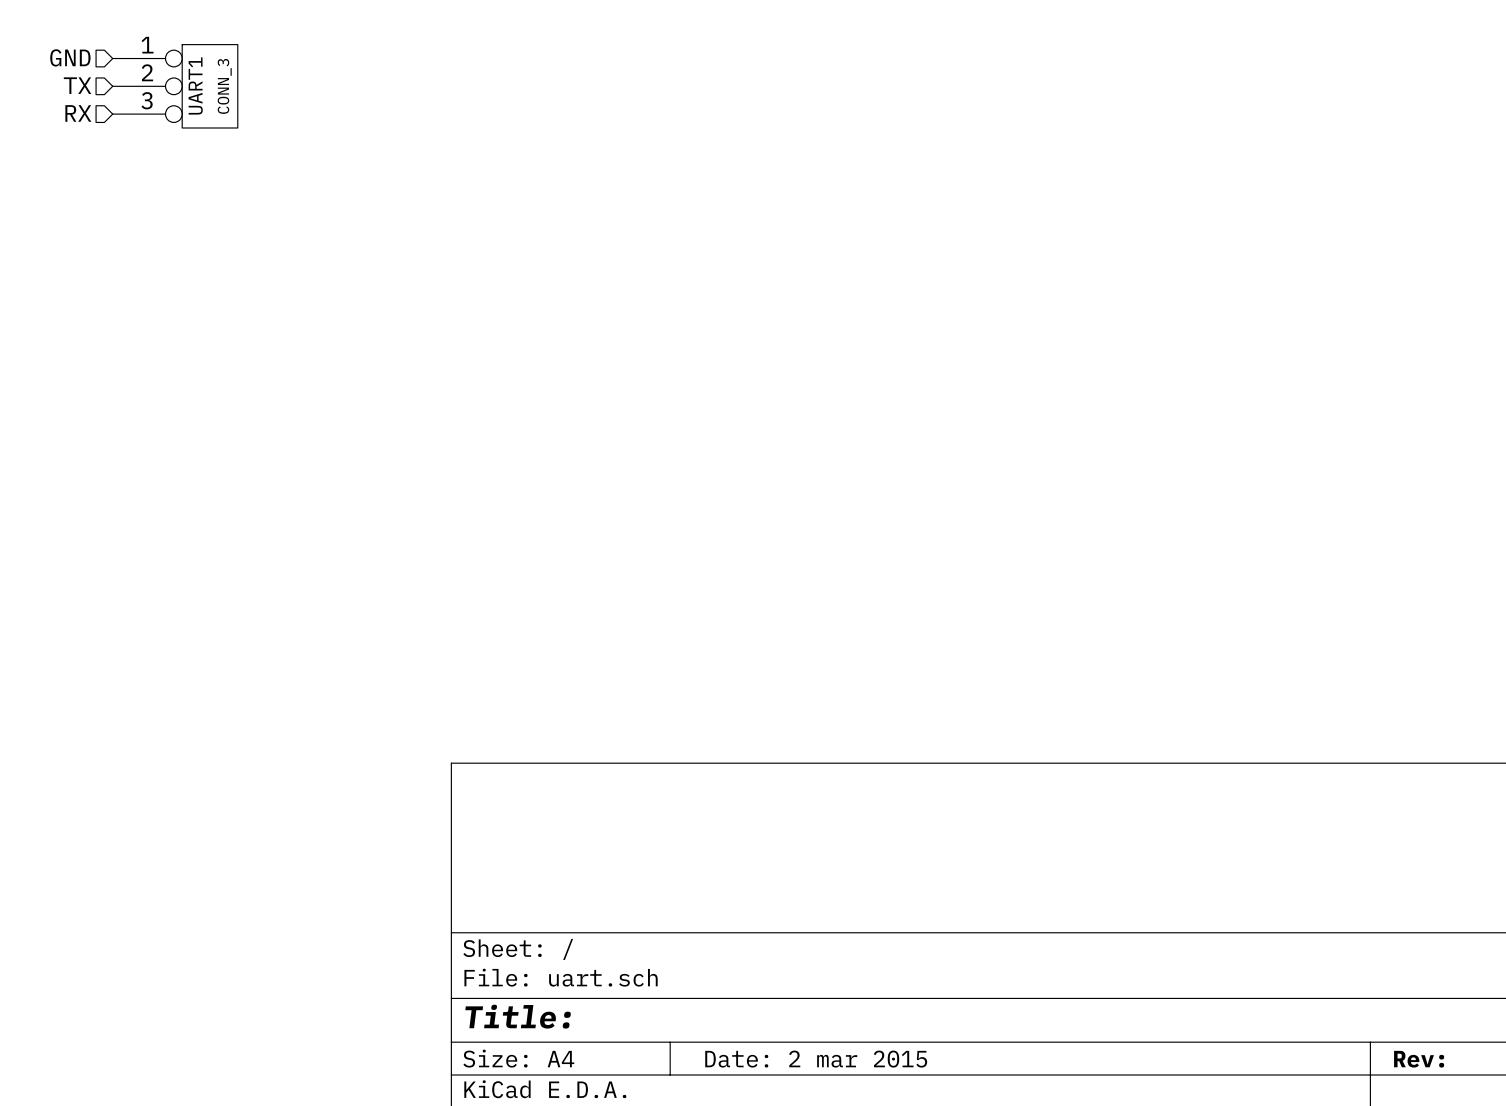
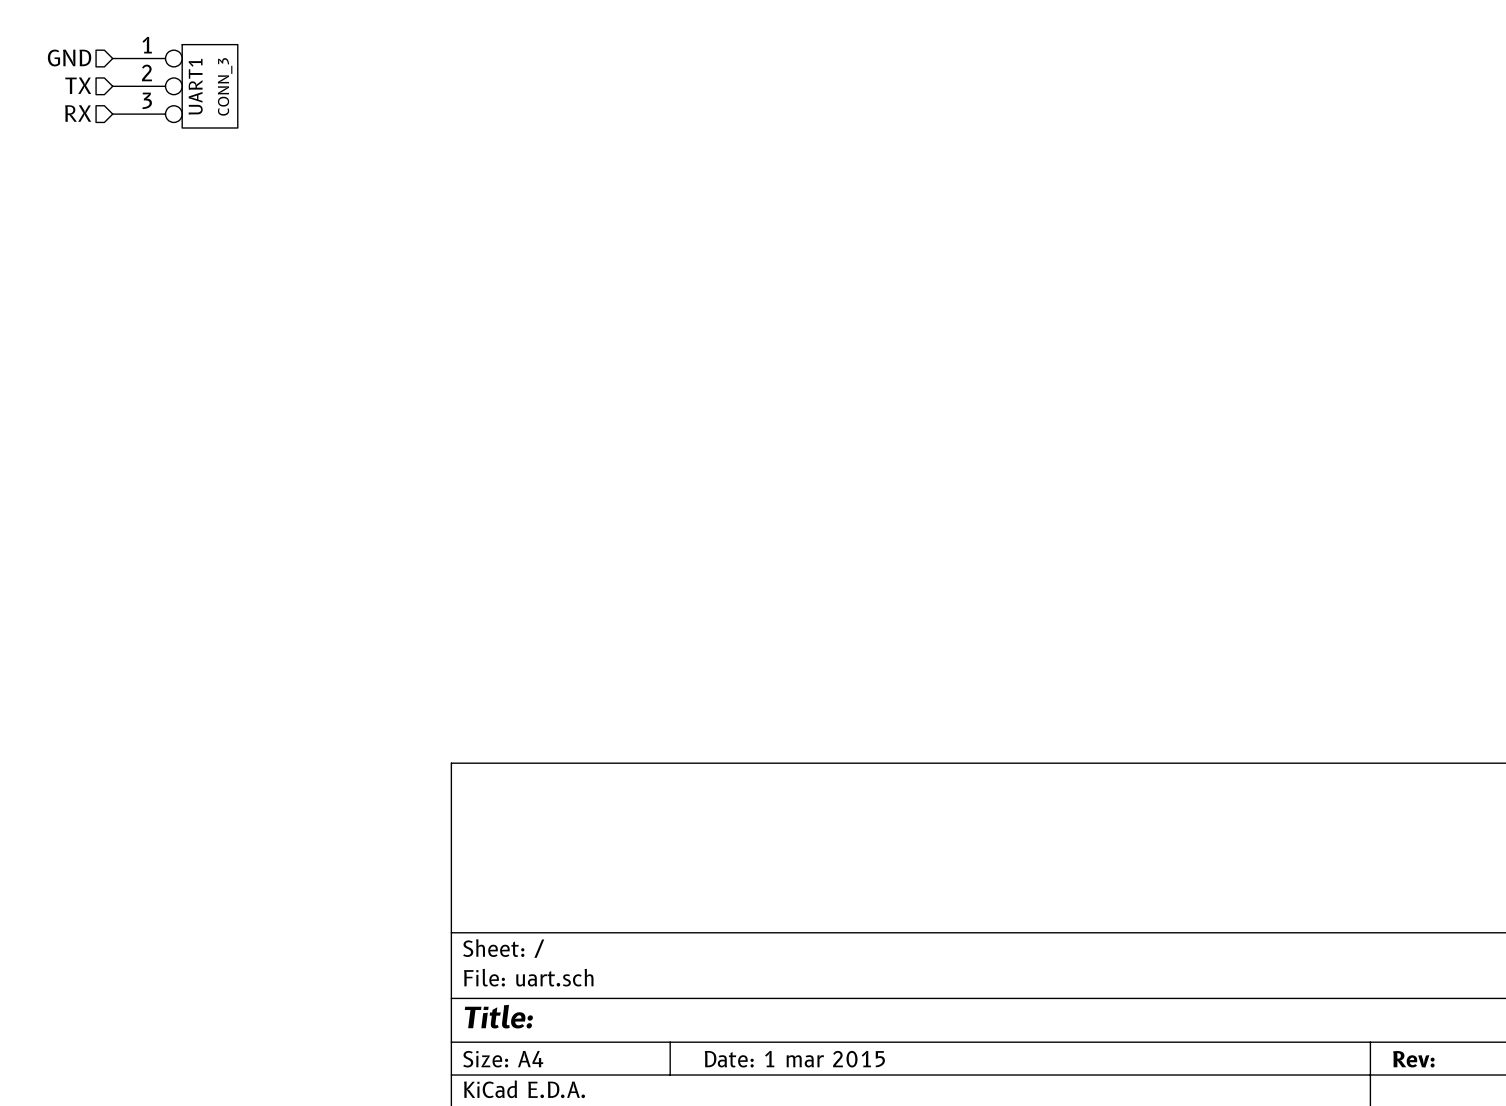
title block: Date: 2 mar 2015 (816, 1059) -> Date: 1 mar 2015 (794, 1059)

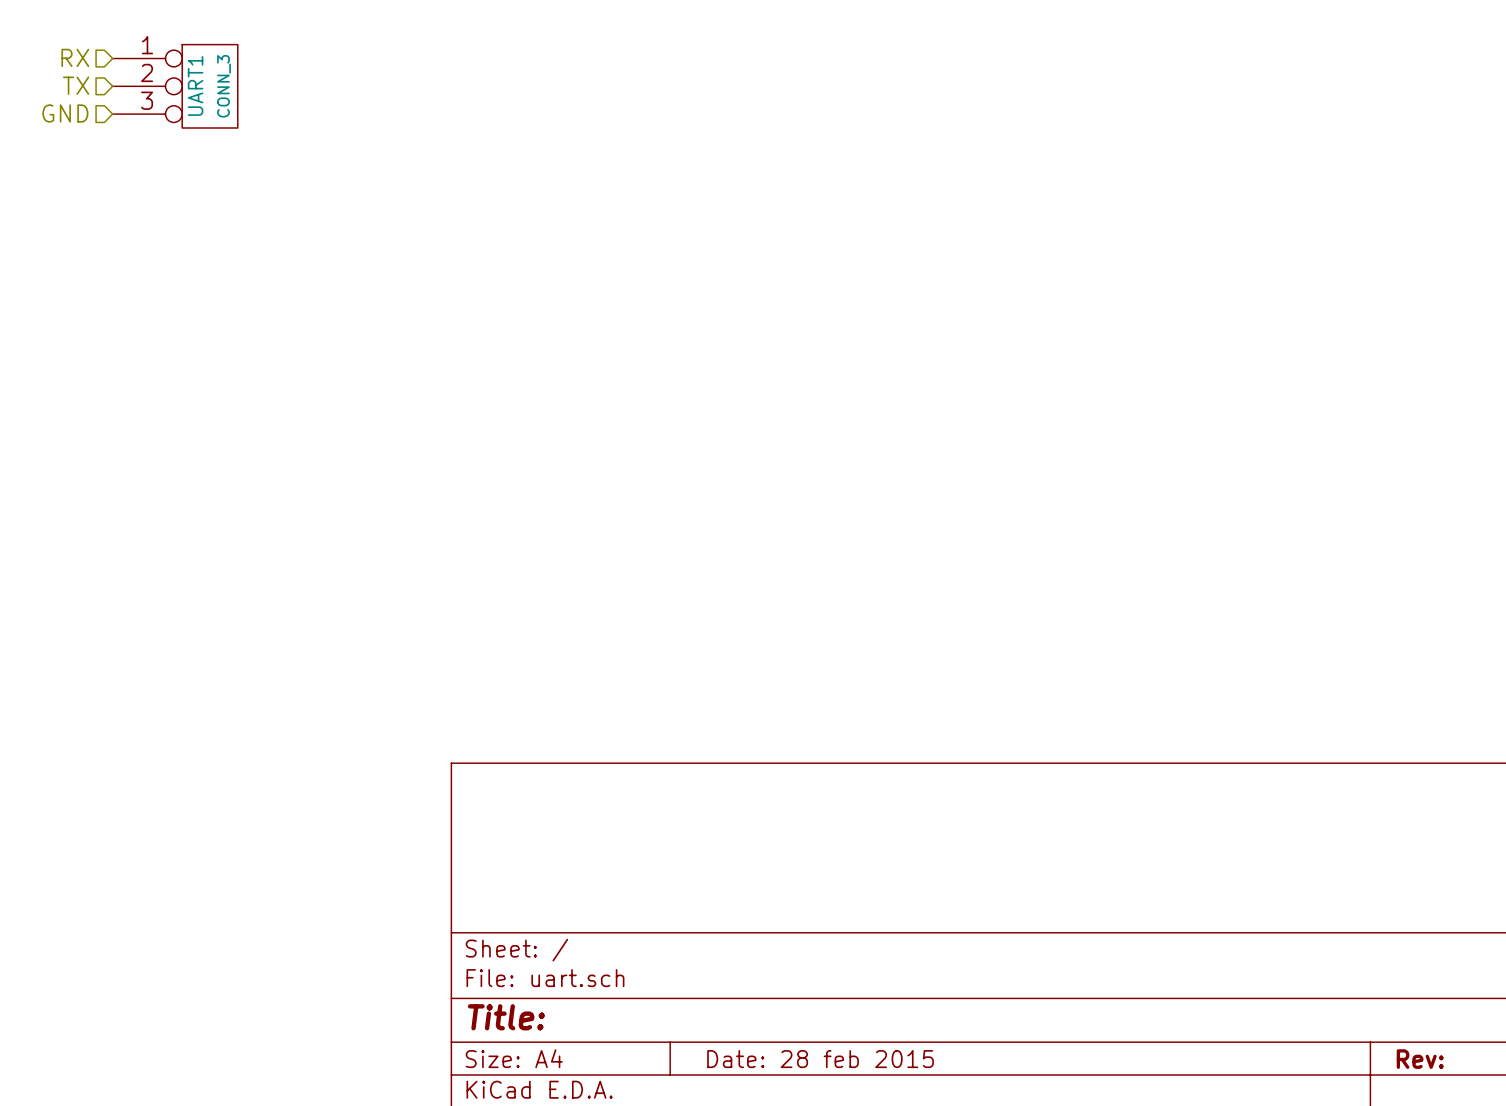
hierarchical label: GND (69, 57) -> RX (75, 57)
hierarchical label: RX (78, 113) -> GND (65, 113)
title block: Date: 1 mar 2015 (794, 1059) -> Date: 28 feb 2015 (820, 1059)

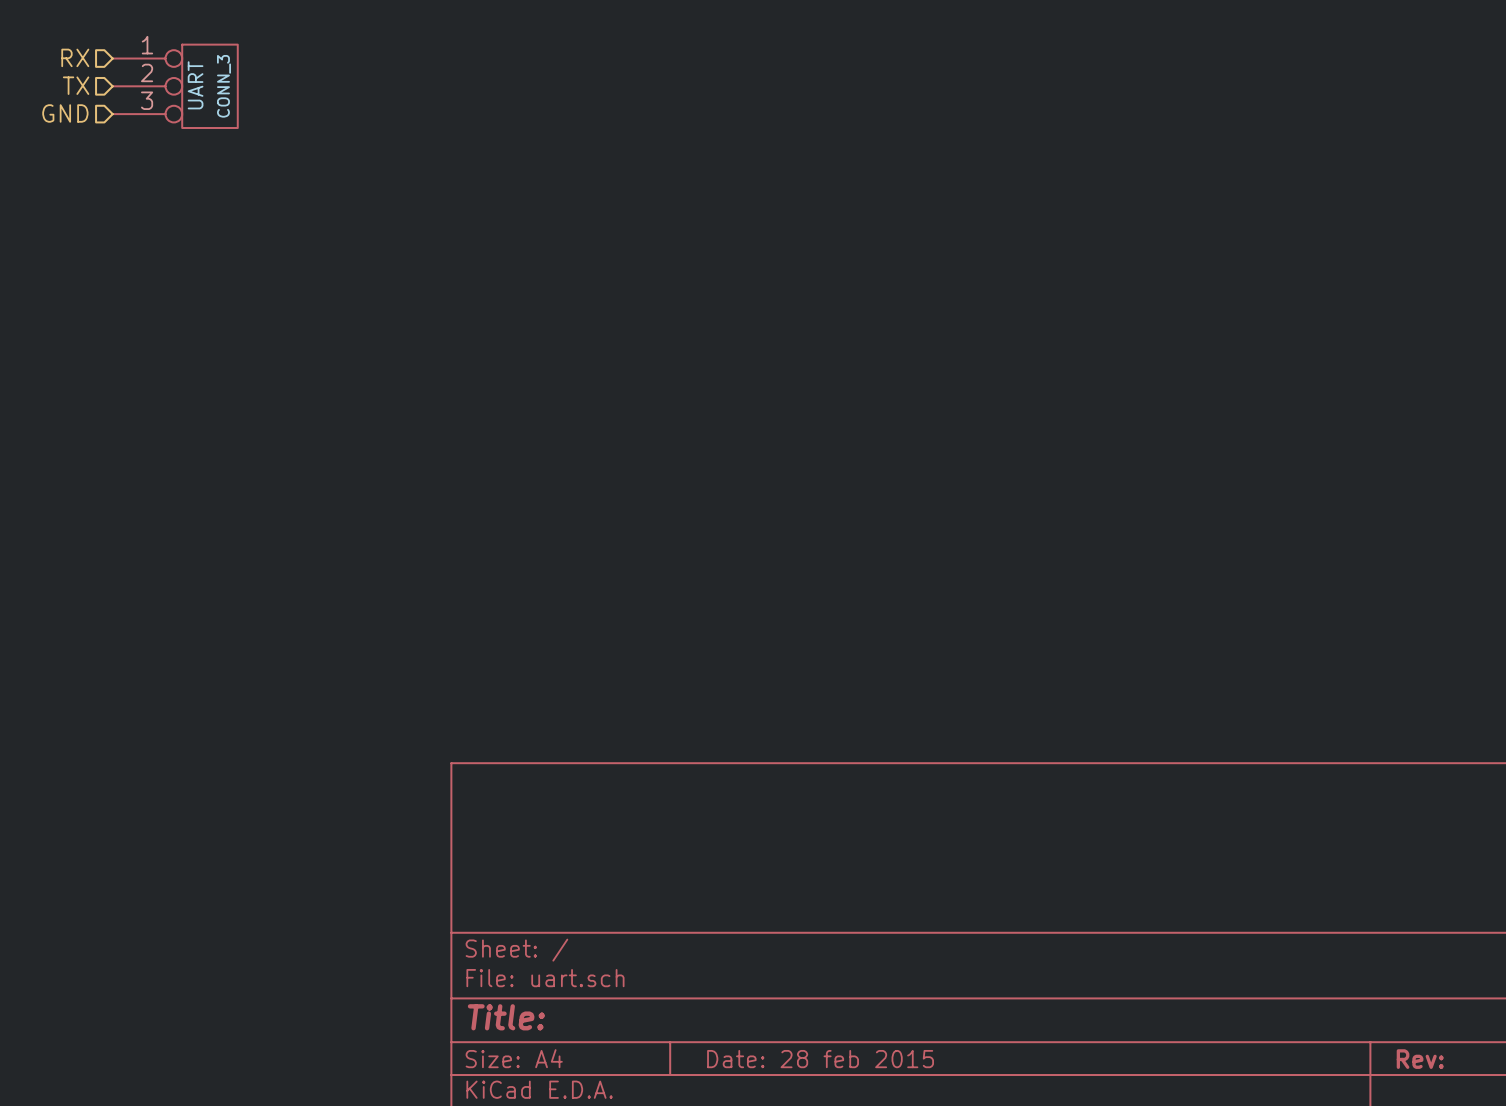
UART1 name: UART1 (195, 85) -> UART (195, 85)

